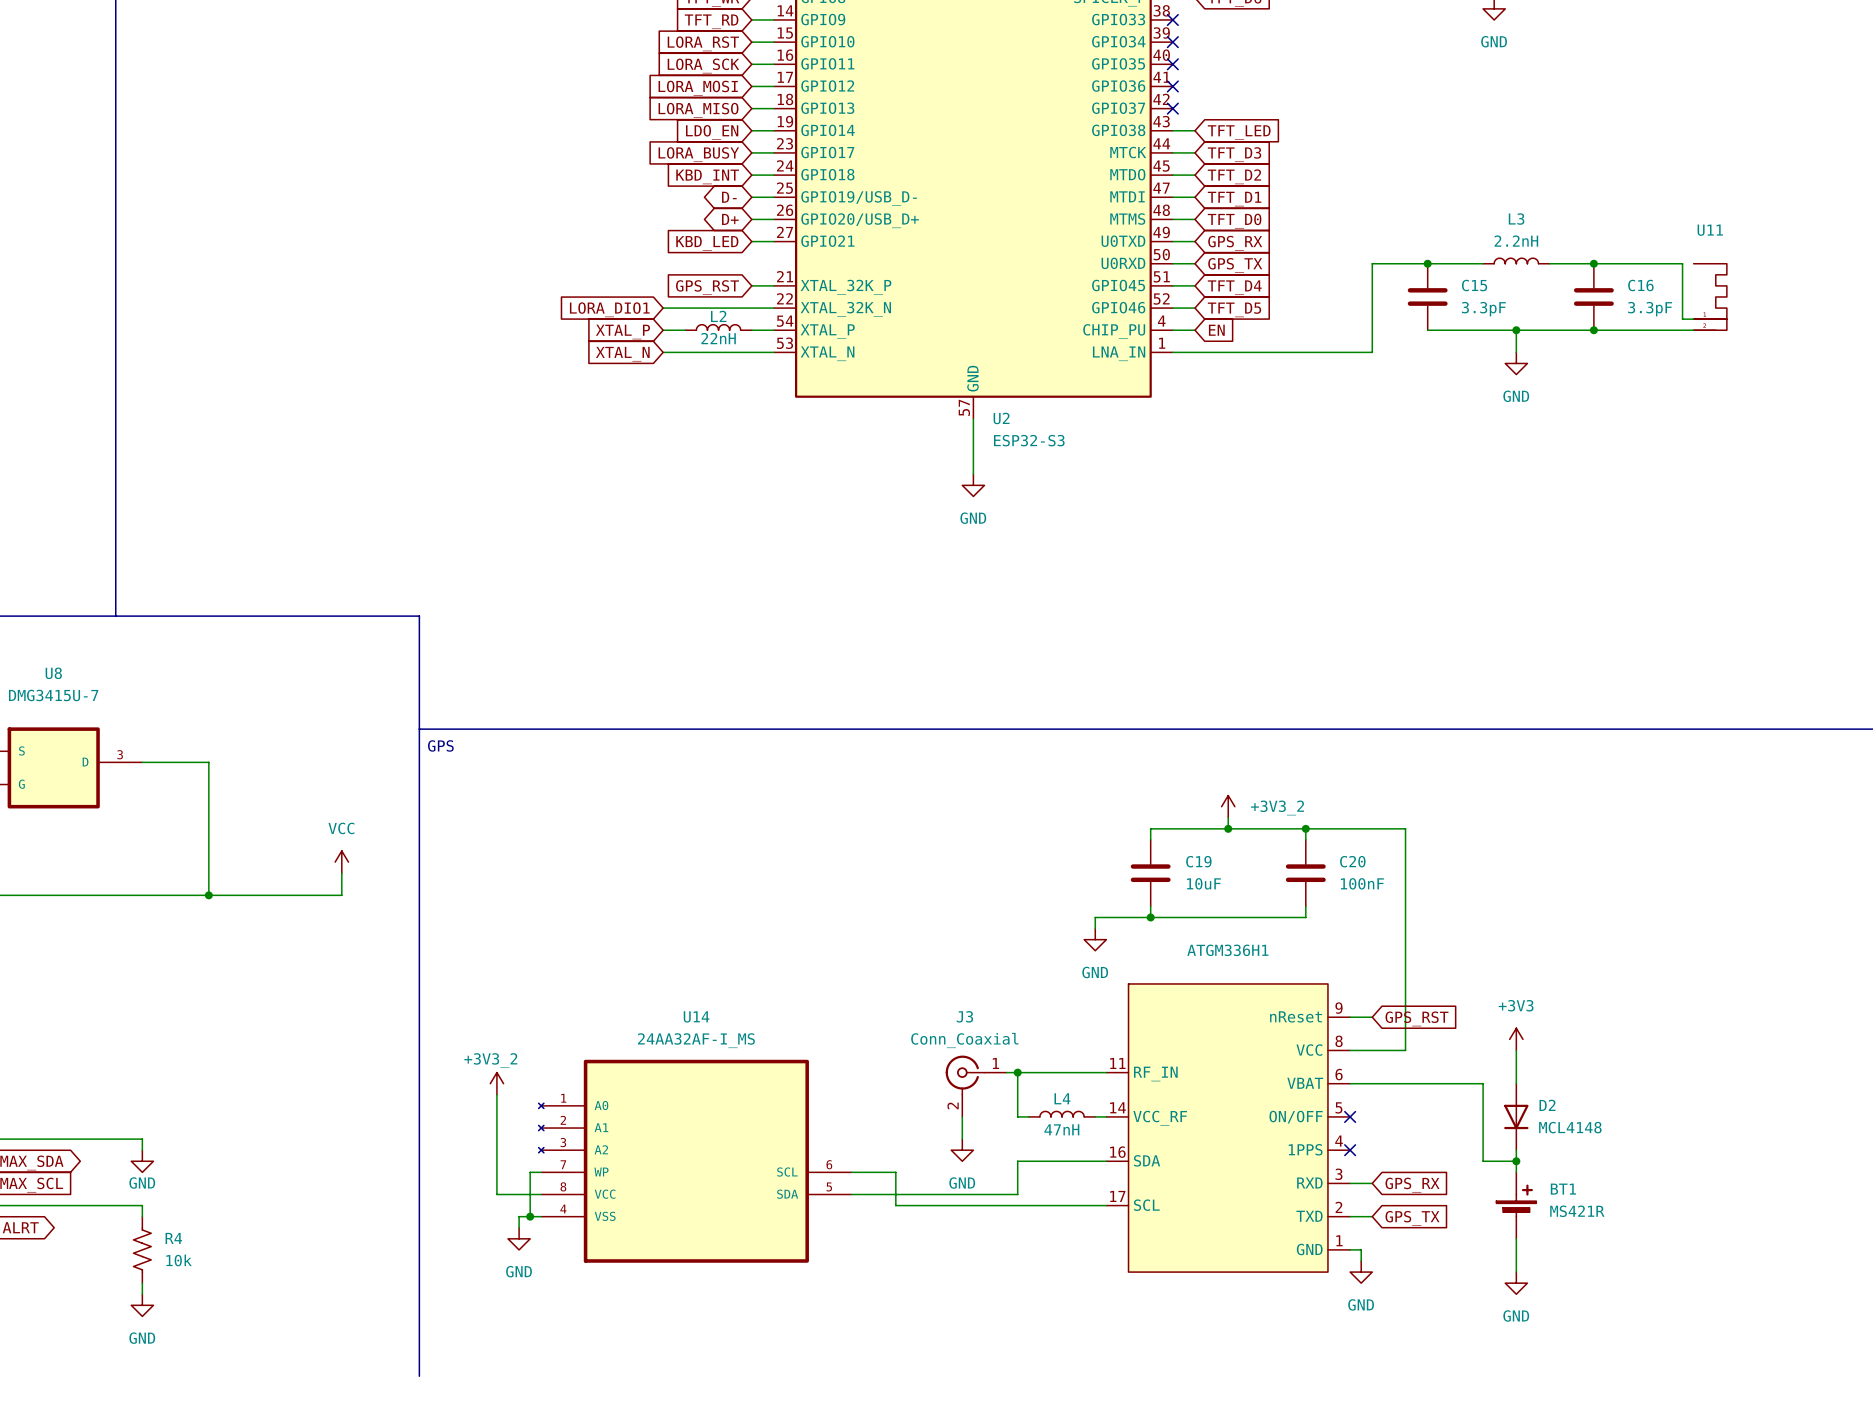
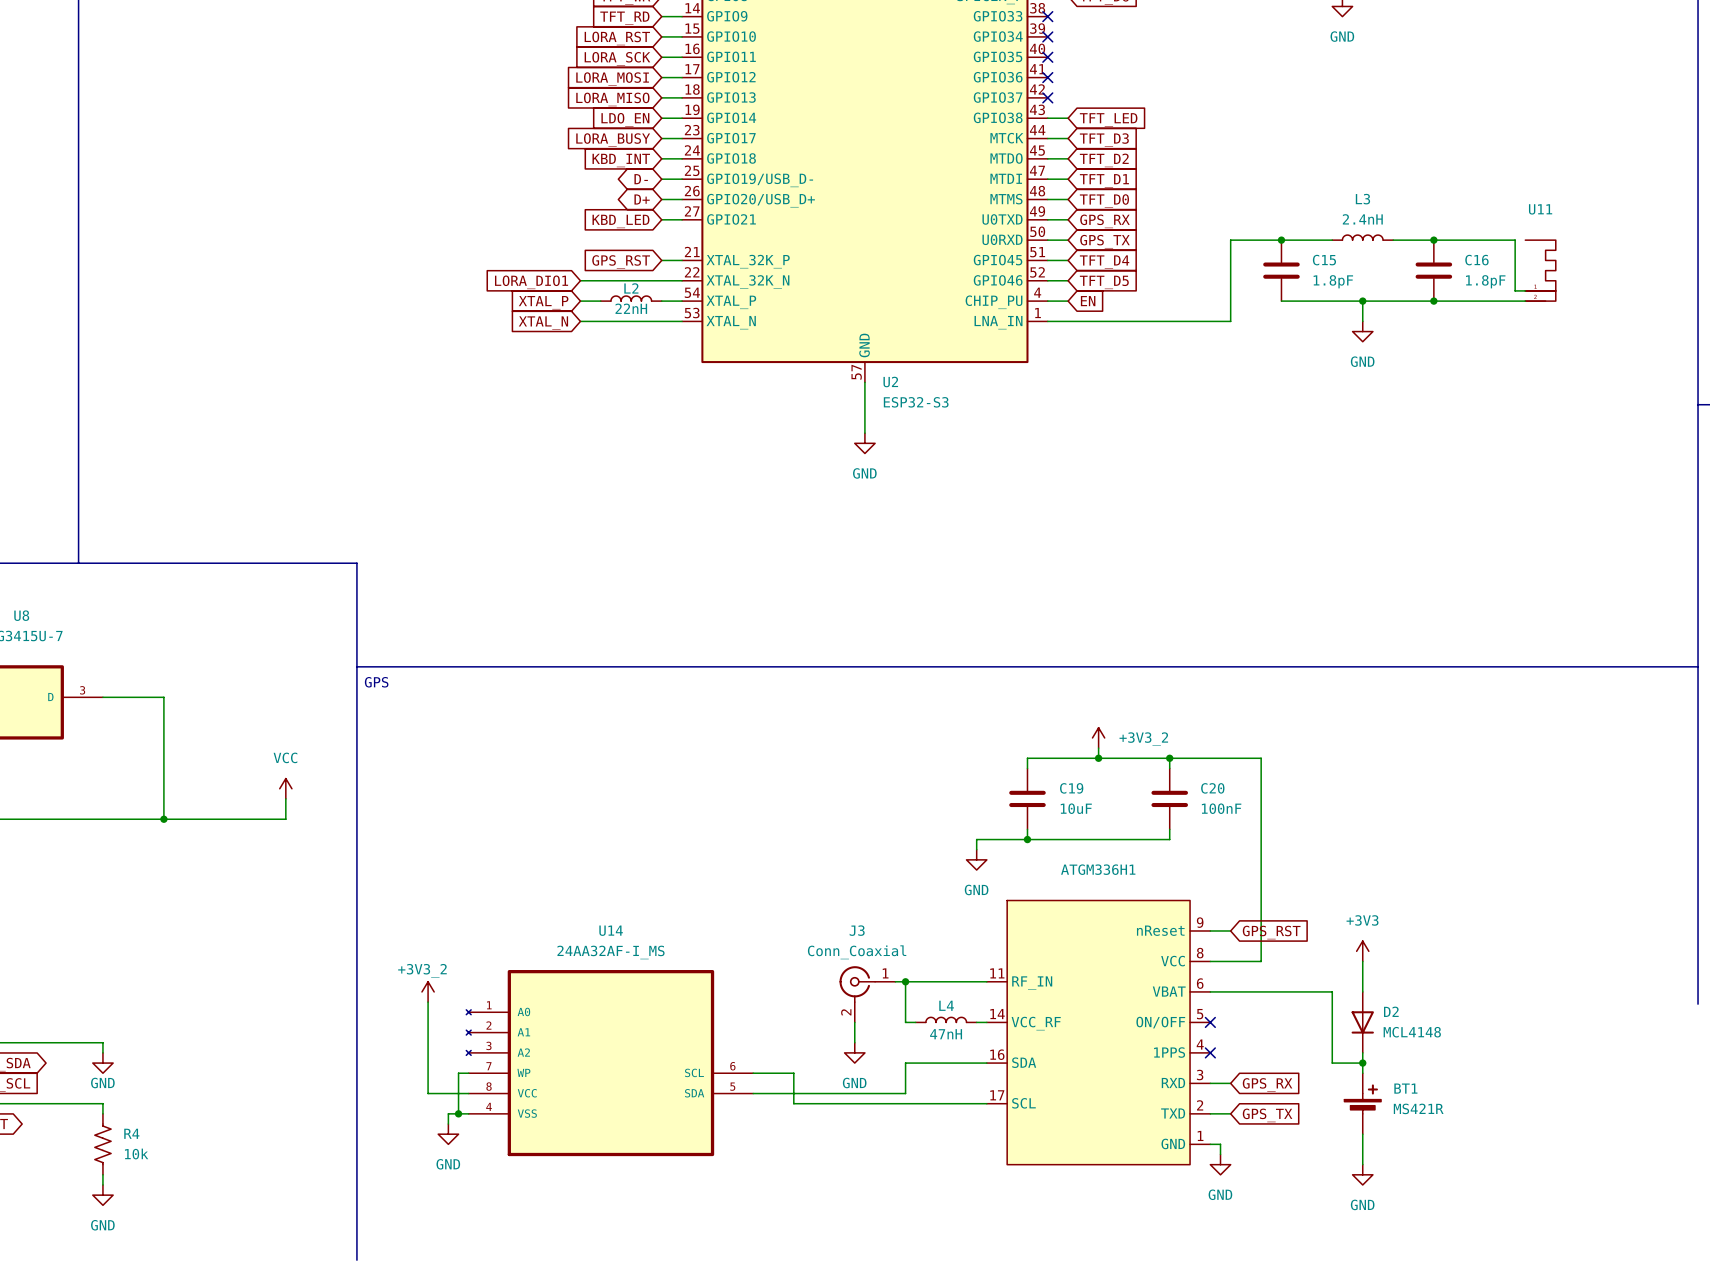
L3 value: 2.2nH (1516, 241) -> 2.4nH (1362, 219)
C15 value: 3.3pF (1483, 309) -> 1.8pF (1333, 281)
C16 value: 3.3pF (1650, 309) -> 1.8pF (1485, 281)

